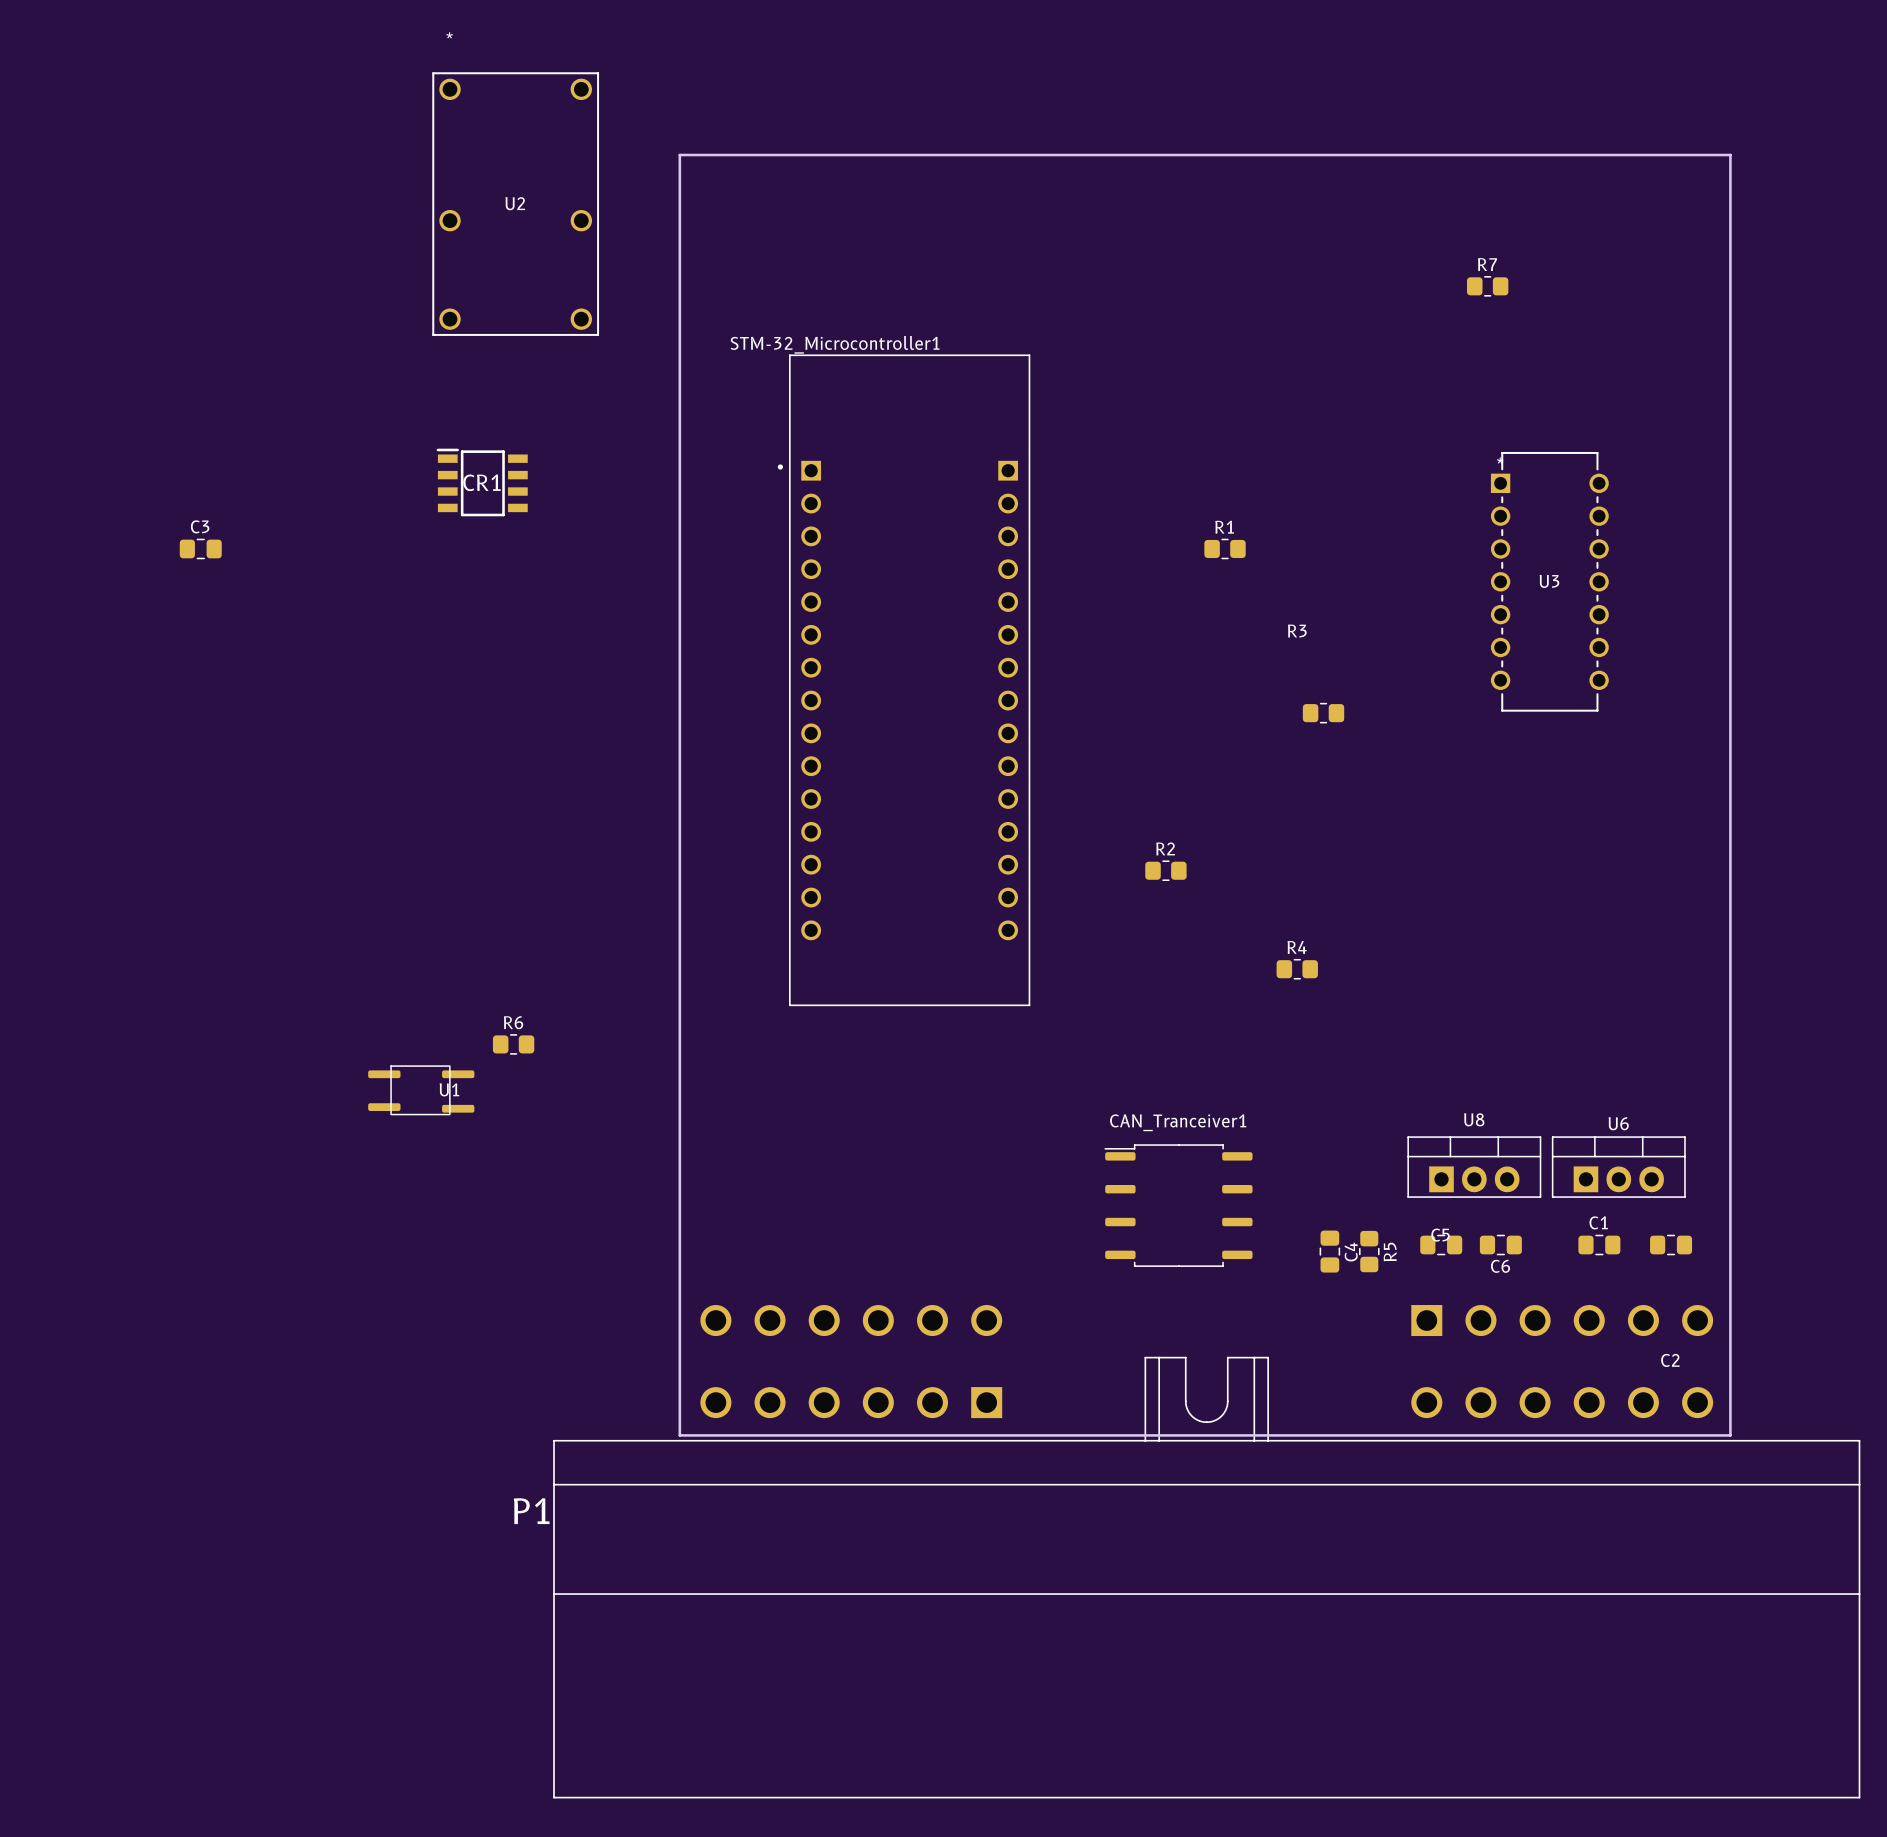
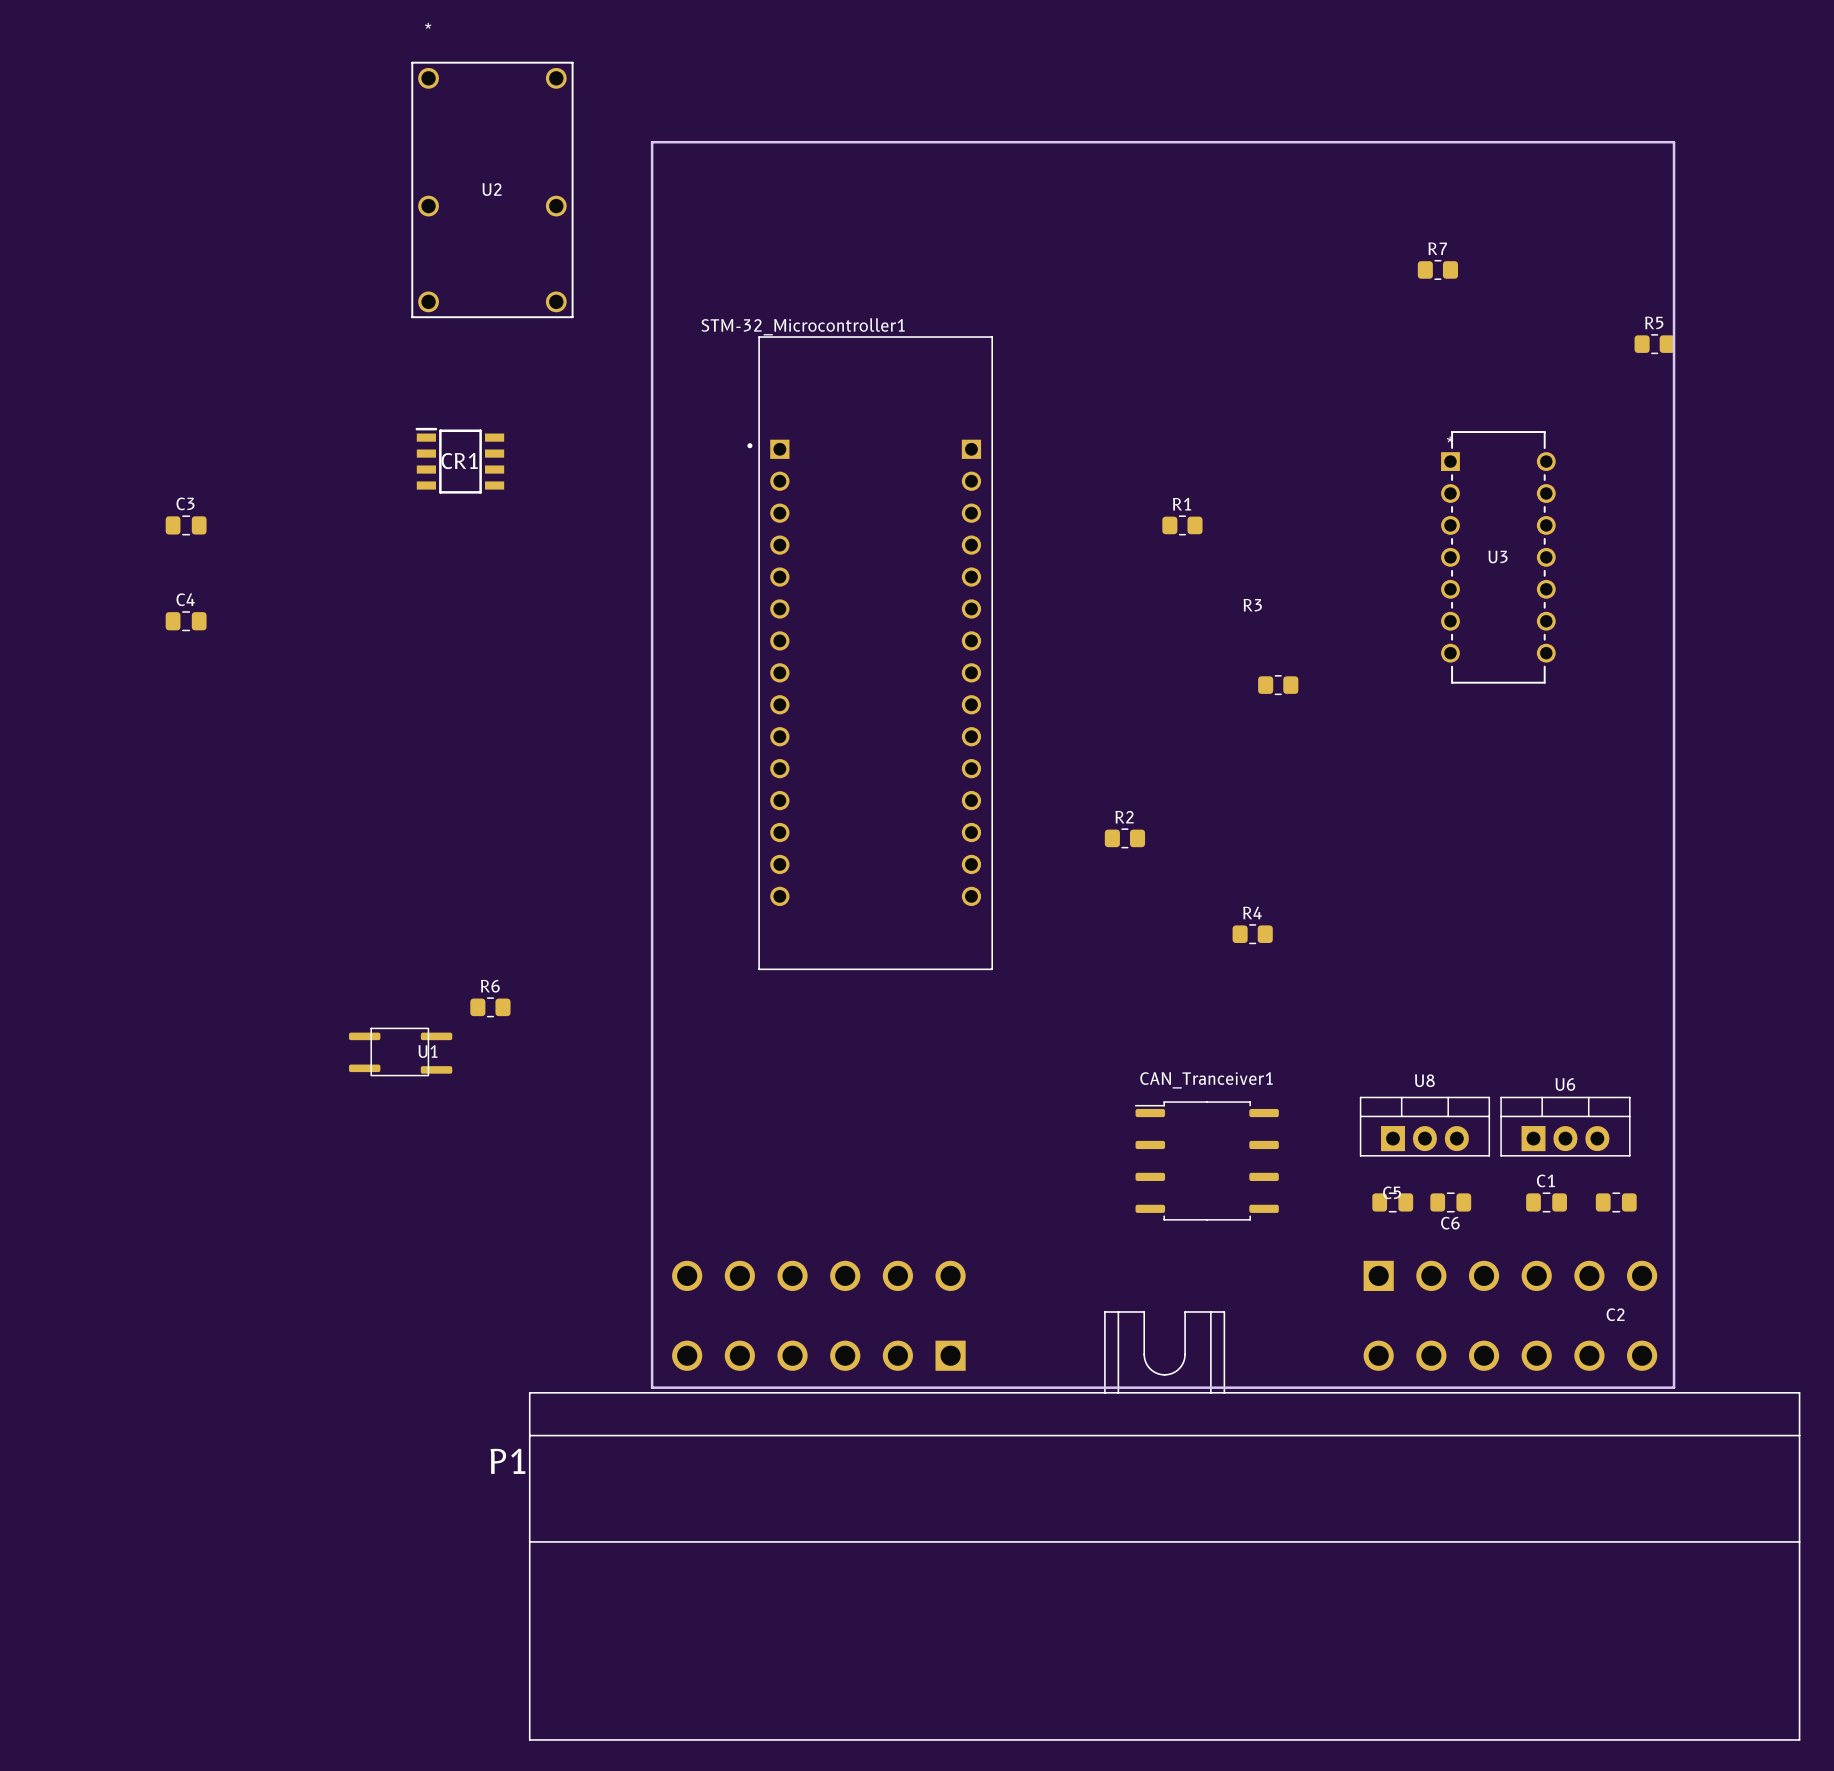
CAN_Tranceiver1 position: (1178, 1205) -> (1206, 1160)
C4 rotation: 0° (1329, 1251) -> 90° clockwise (186, 621)
C4 position: (1329, 1251) -> (186, 621)
R5 rotation: 0° (1369, 1251) -> 90° clockwise (1654, 344)
R5 position: (1369, 1251) -> (1654, 344)
R5 name position: R5 (1390, 1251) -> R5 (1654, 322)
C4 name position: C4 (1351, 1252) -> C4 (185, 599)

